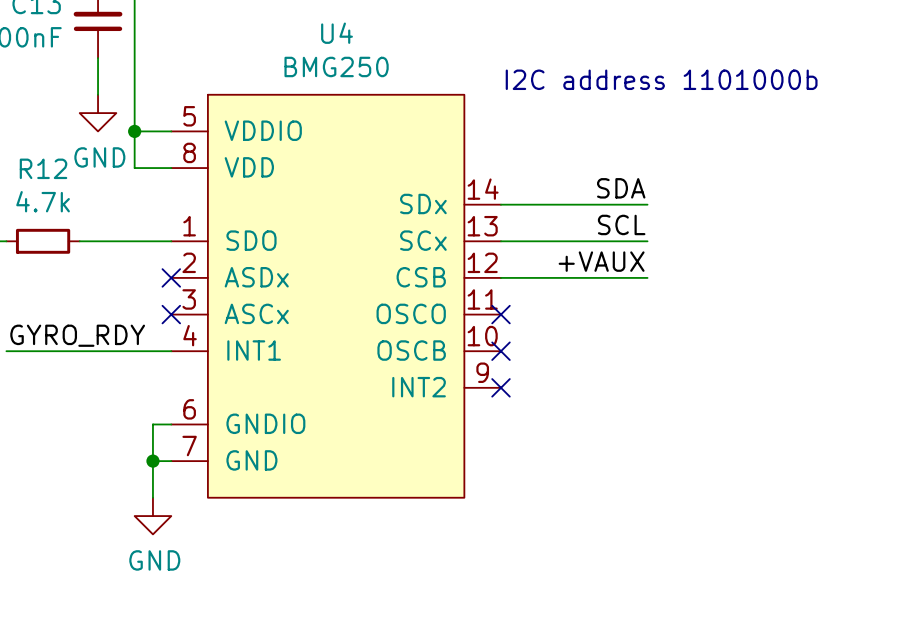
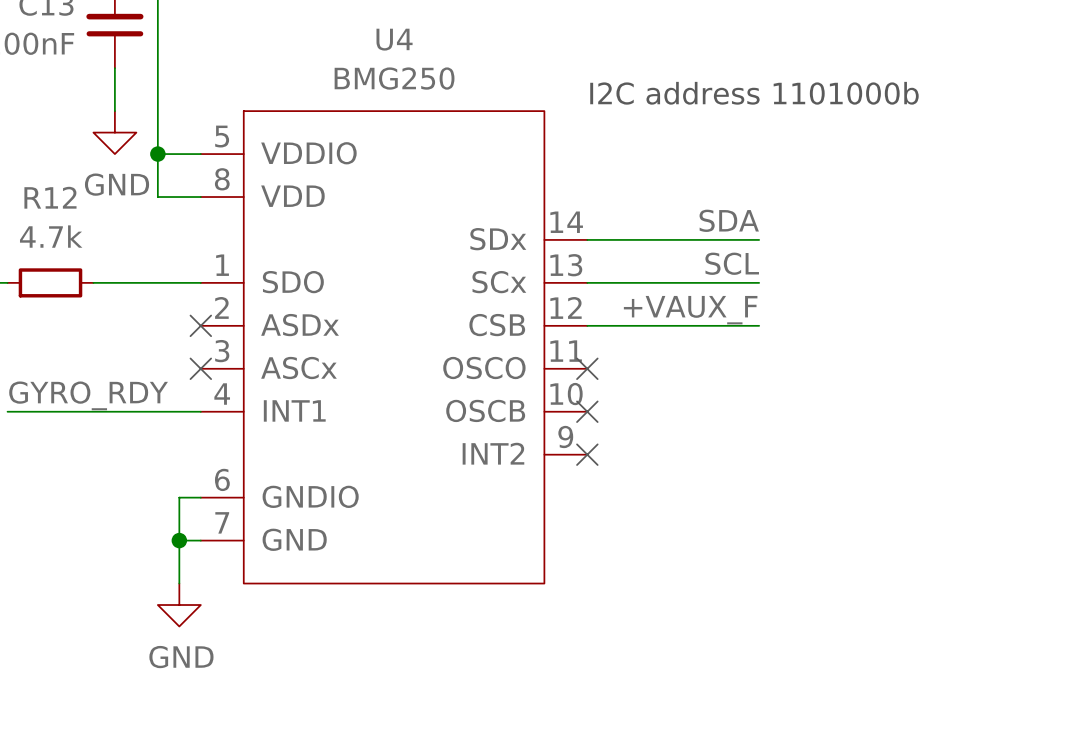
label: +VAUX (601, 261) -> +VAUX_F (690, 310)

